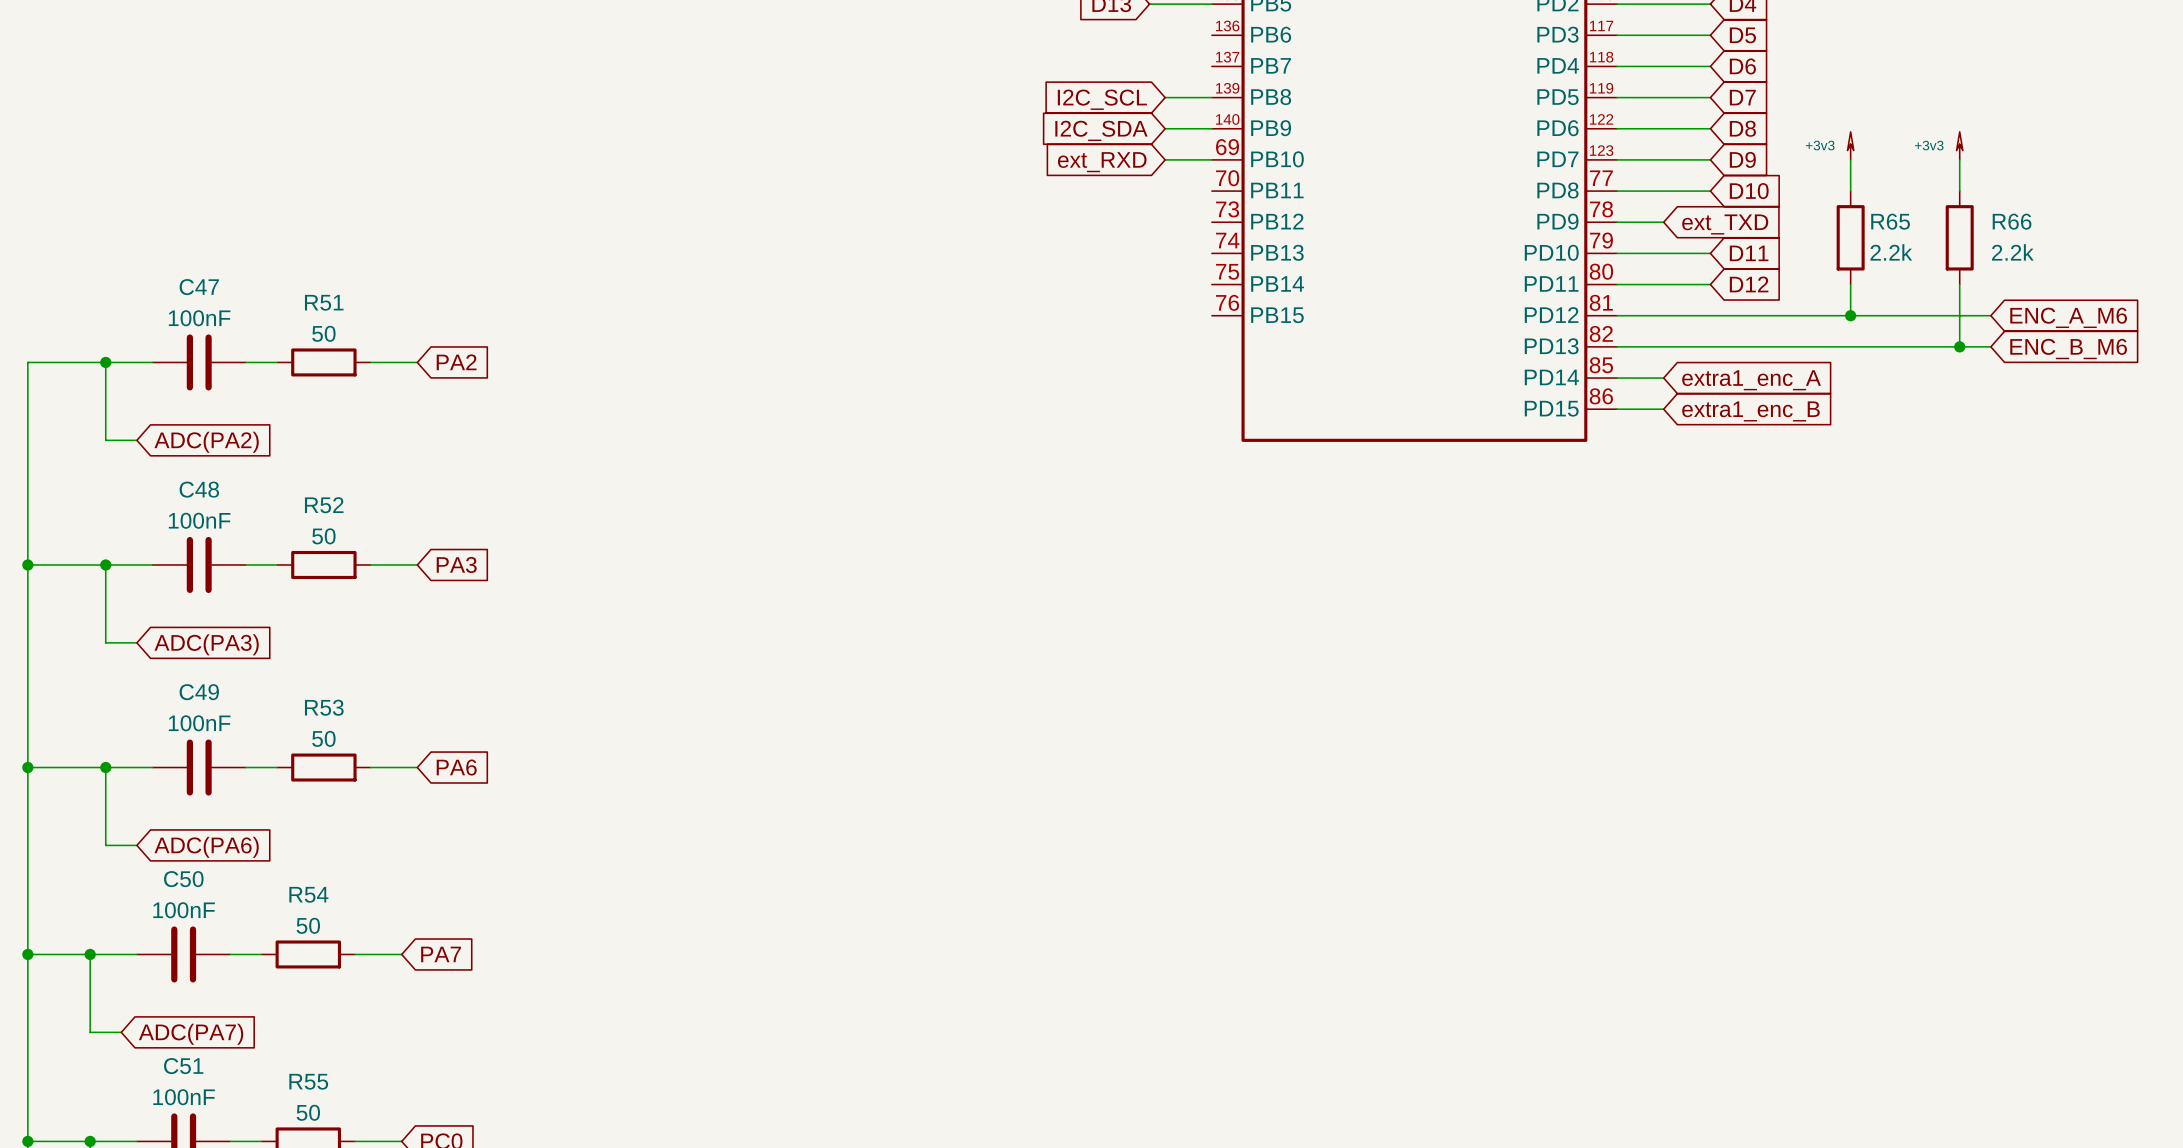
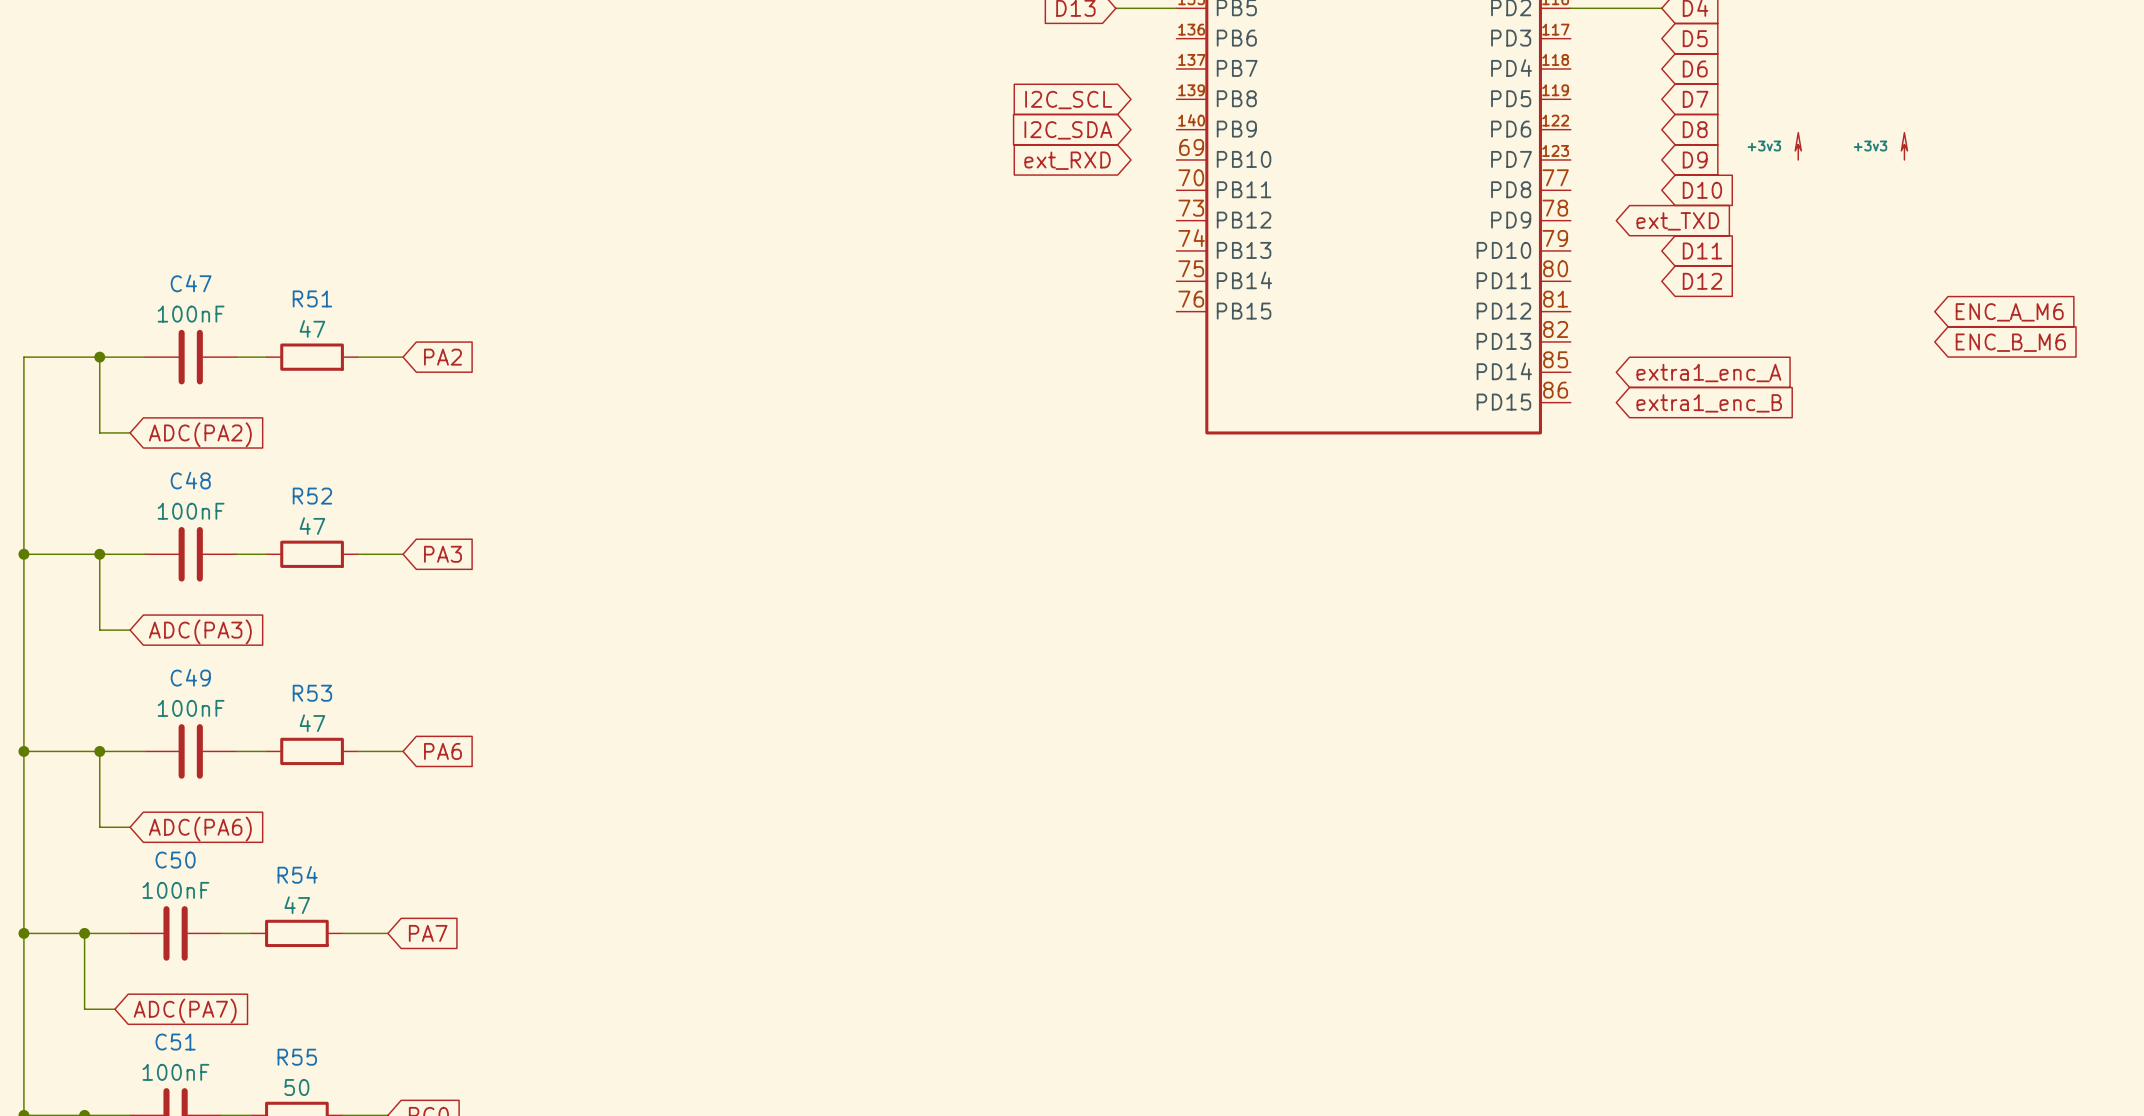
wire: (1616, 35) (1710, 35) -> none
wire: (1616, 66) (1710, 66) -> none
wire: (1165, 97) (1211, 97) -> none
wire: (1616, 97) (1710, 97) -> none
wire: (1165, 128) (1211, 128) -> none
wire: (1616, 128) (1710, 128) -> none
wire: (1165, 159) (1211, 159) -> none
wire: (1616, 159) (1710, 159) -> none
wire: (1850, 159) (1850, 191) -> none
wire: (1959, 159) (1959, 191) -> none
wire: (1616, 191) (1710, 191) -> none
wire: (1616, 222) (1663, 222) -> none
R65: 2.2k (1850, 237) -> none
R66: 2.2k (1959, 237) -> none
wire: (1616, 253) (1710, 253) -> none
wire: (1616, 284) (1710, 284) -> none
wire: (1850, 284) (1850, 315) -> none
wire: (1959, 284) (1959, 346) -> none
wire: (1616, 315) (1990, 315) -> none
junction: (1850, 315) -> none
R51 value: 50 (323, 333) -> 47 (312, 328)
wire: (1616, 346) (1990, 346) -> none
junction: (1959, 346) -> none
wire: (1616, 378) (1663, 378) -> none
wire: (1616, 409) (1663, 409) -> none
R52 value: 50 (323, 536) -> 47 (312, 526)
R53 value: 50 (323, 738) -> 47 (312, 723)
R54 value: 50 (308, 925) -> 47 (297, 905)

